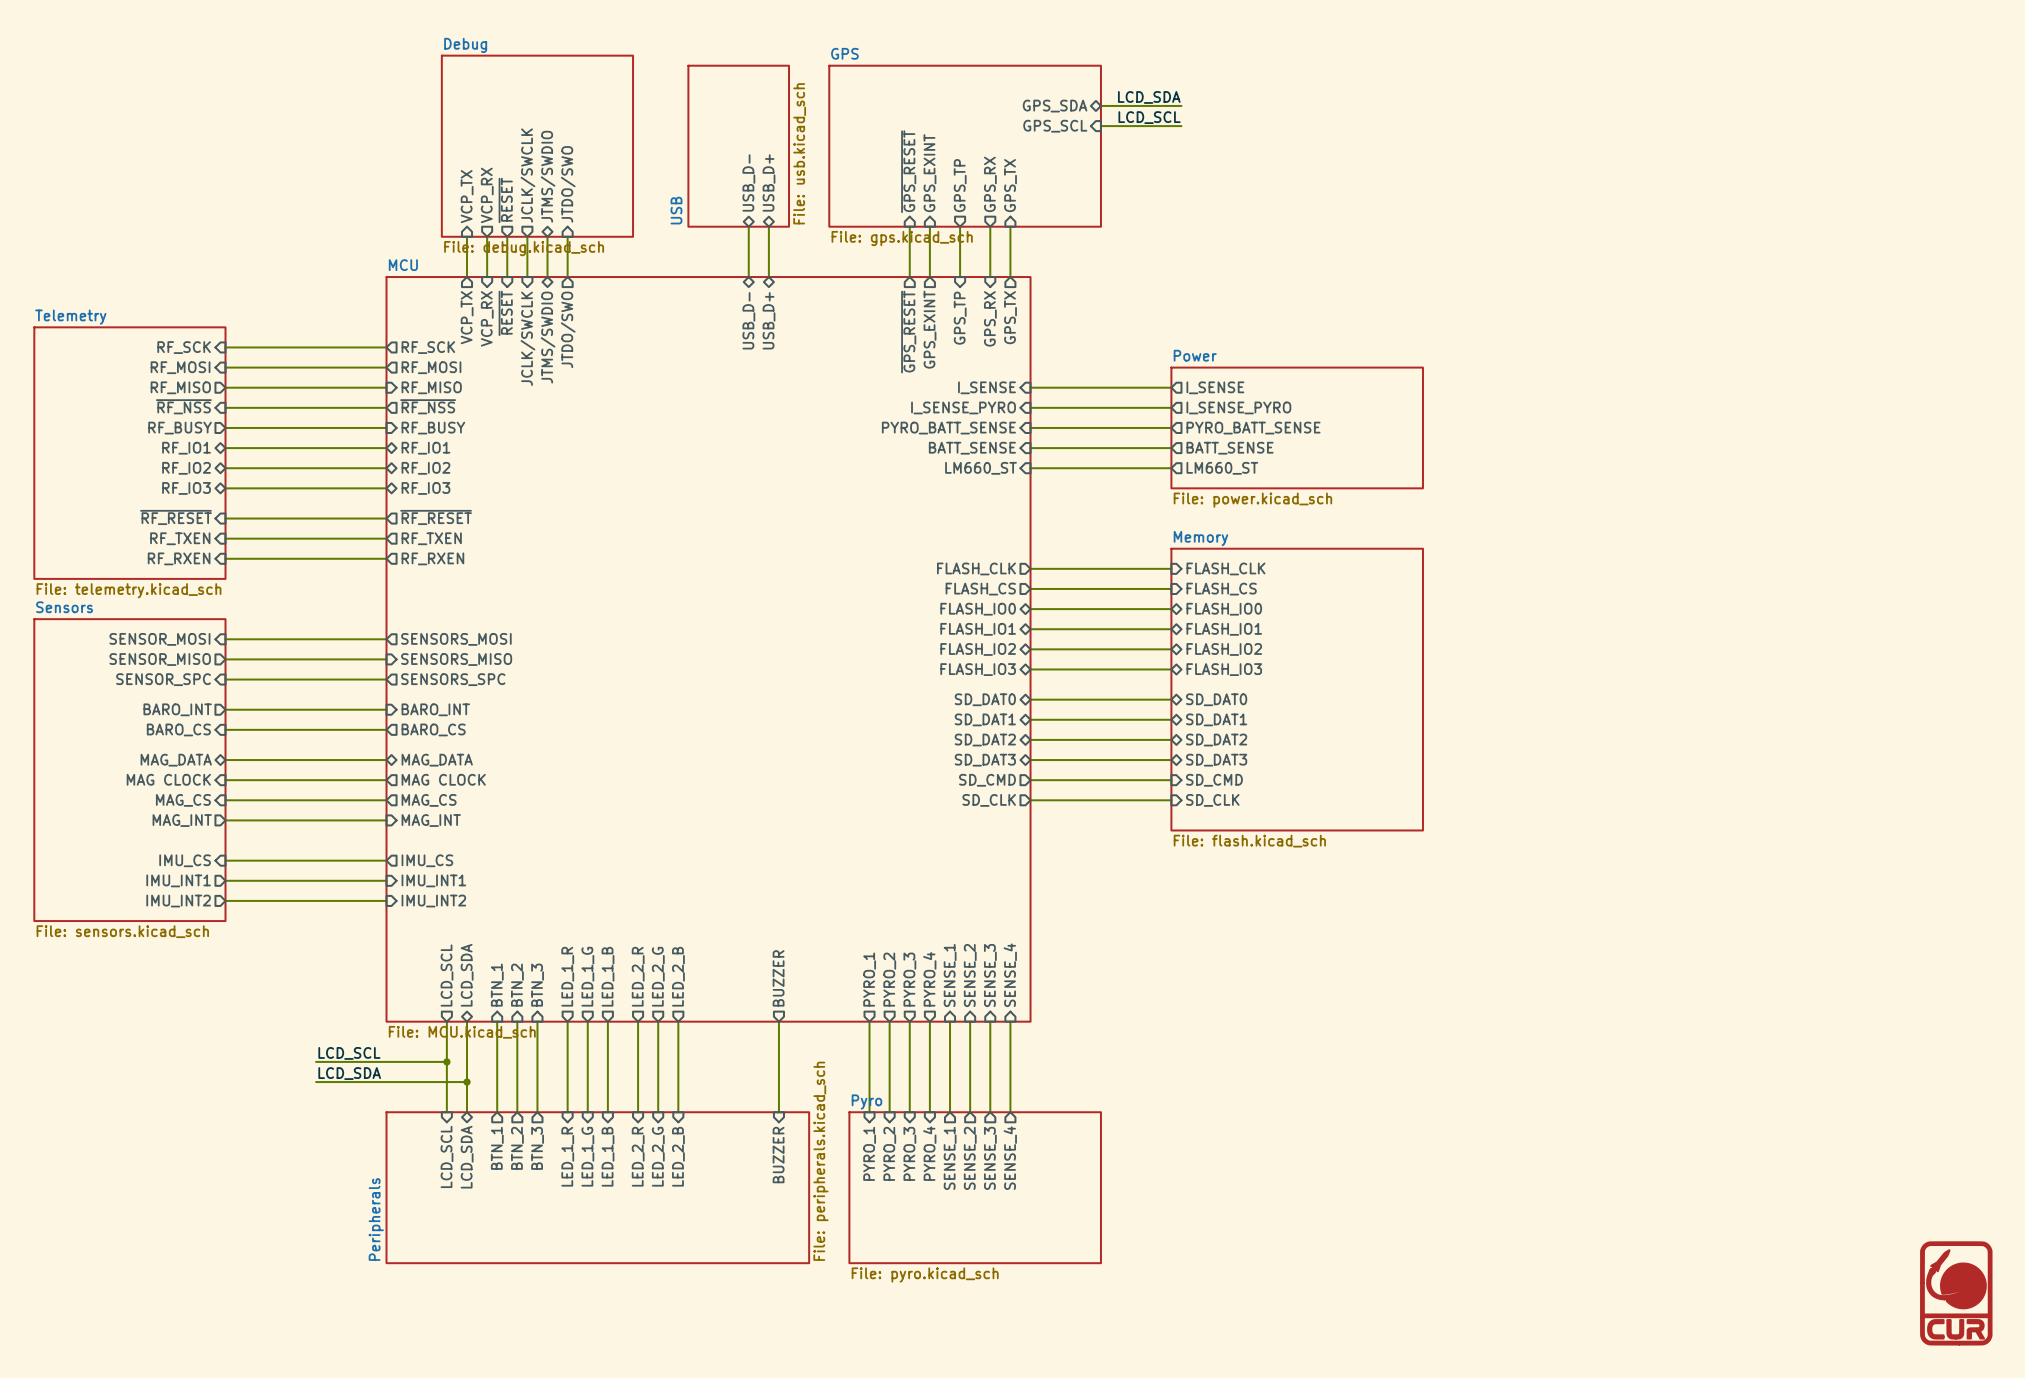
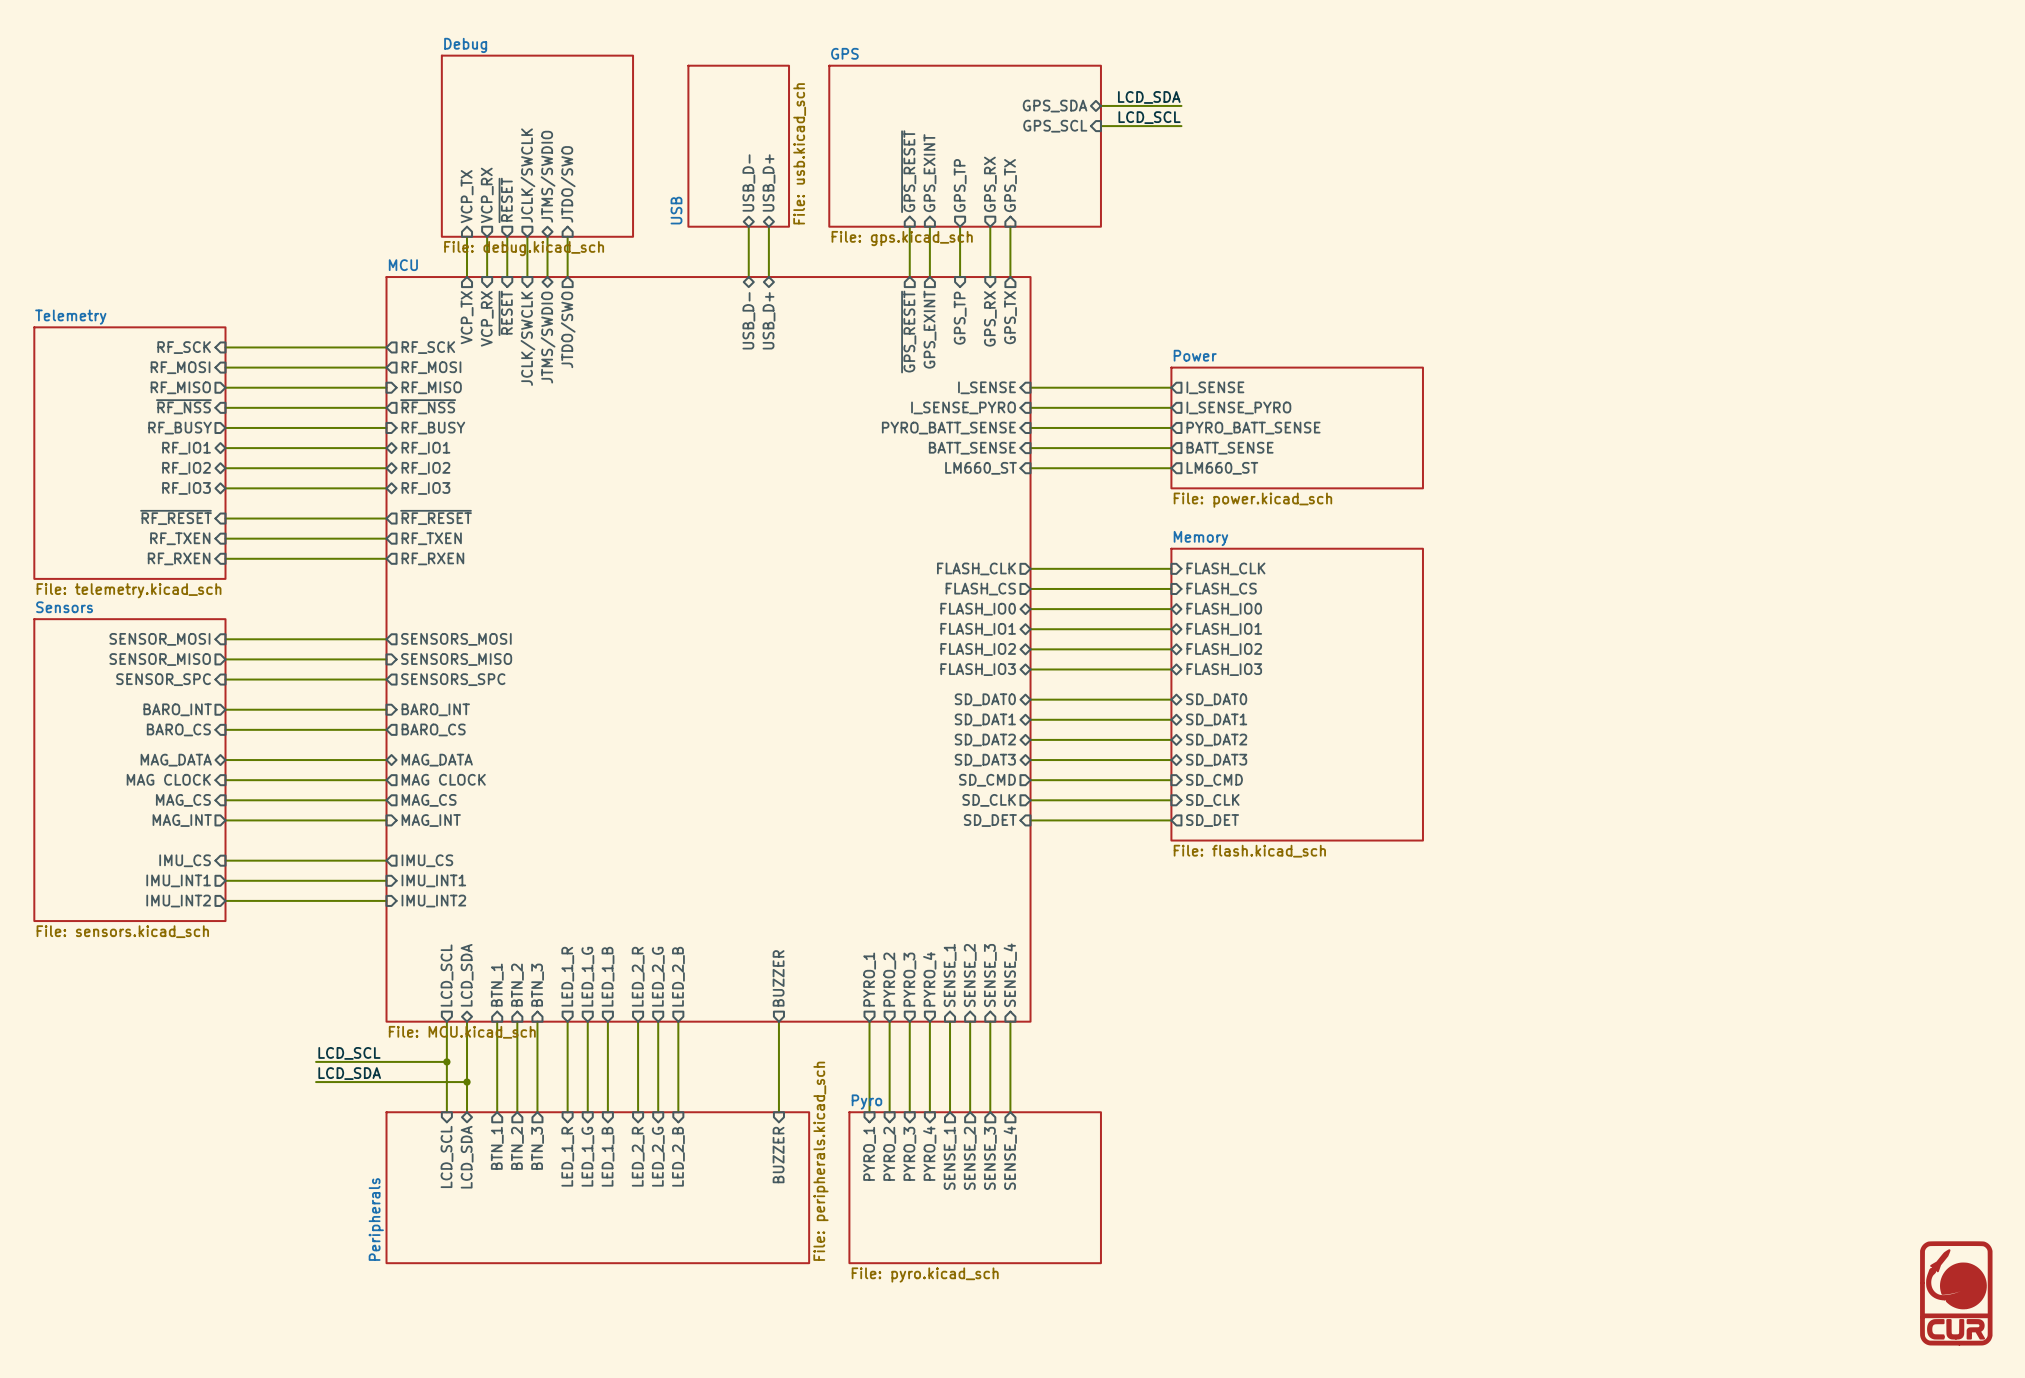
sheet Memory shape: [1170, 548, 1424, 832] -> [1170, 548, 1424, 842]
sheet pin: none -> SD_DET (990, 820)
wire: none -> (1030, 820) (1171, 820)
sheet pin: none -> SD_DET (1212, 820)

